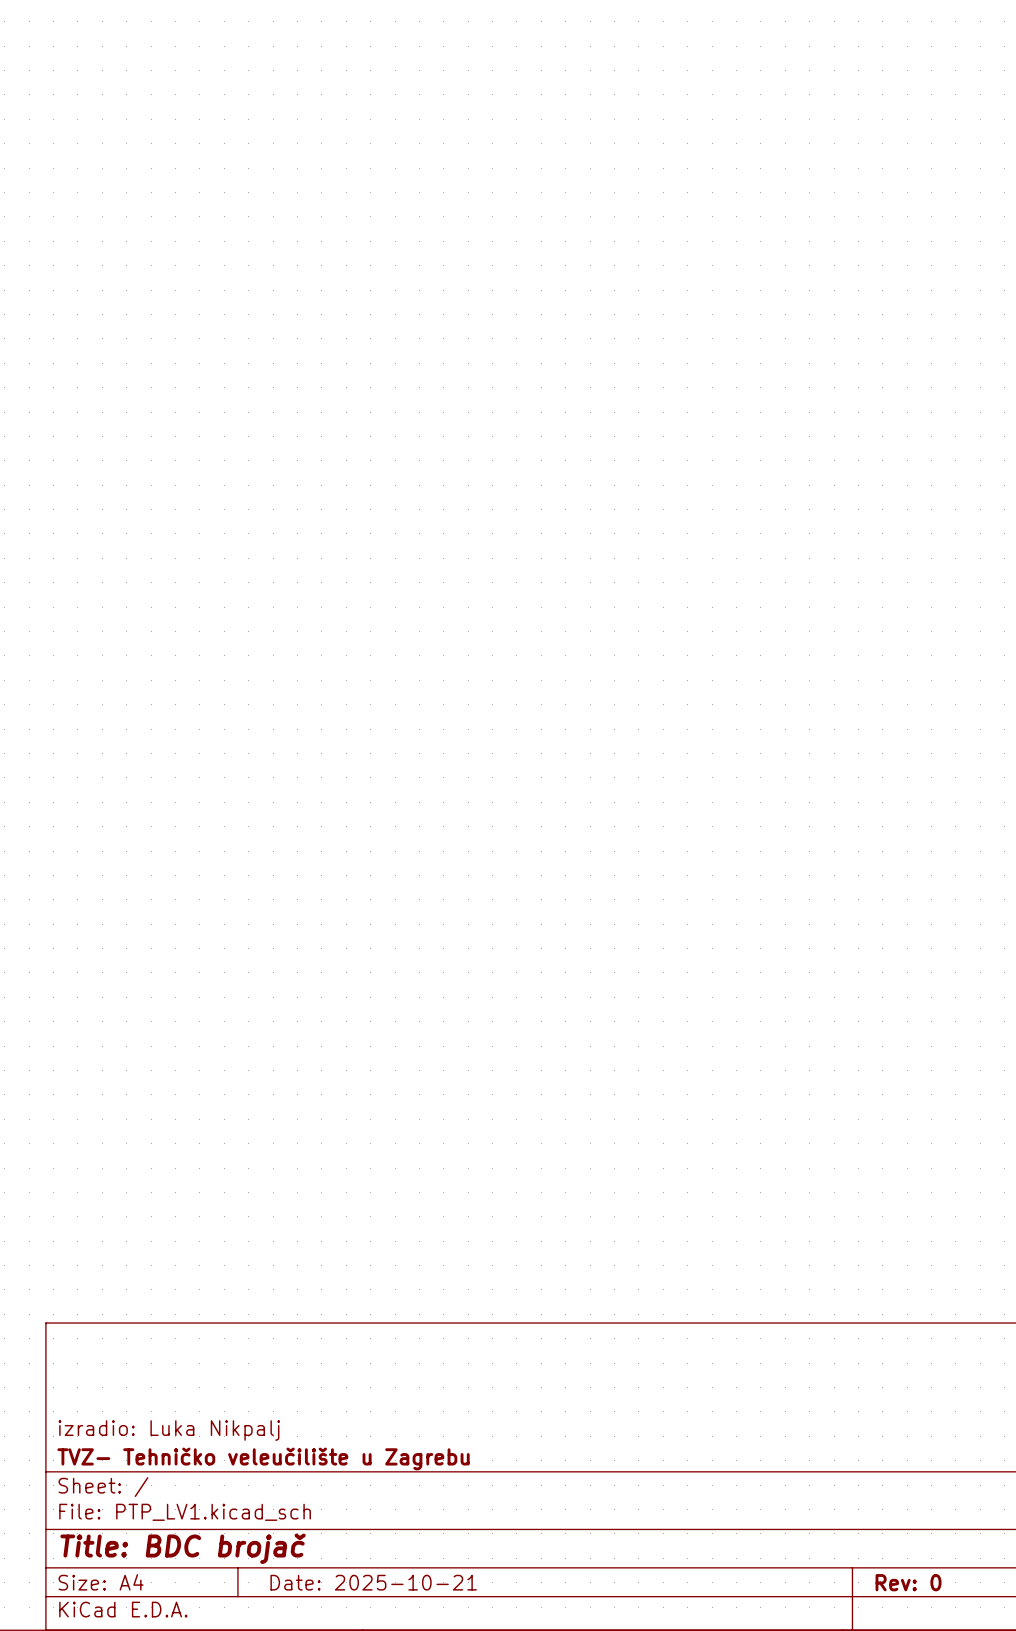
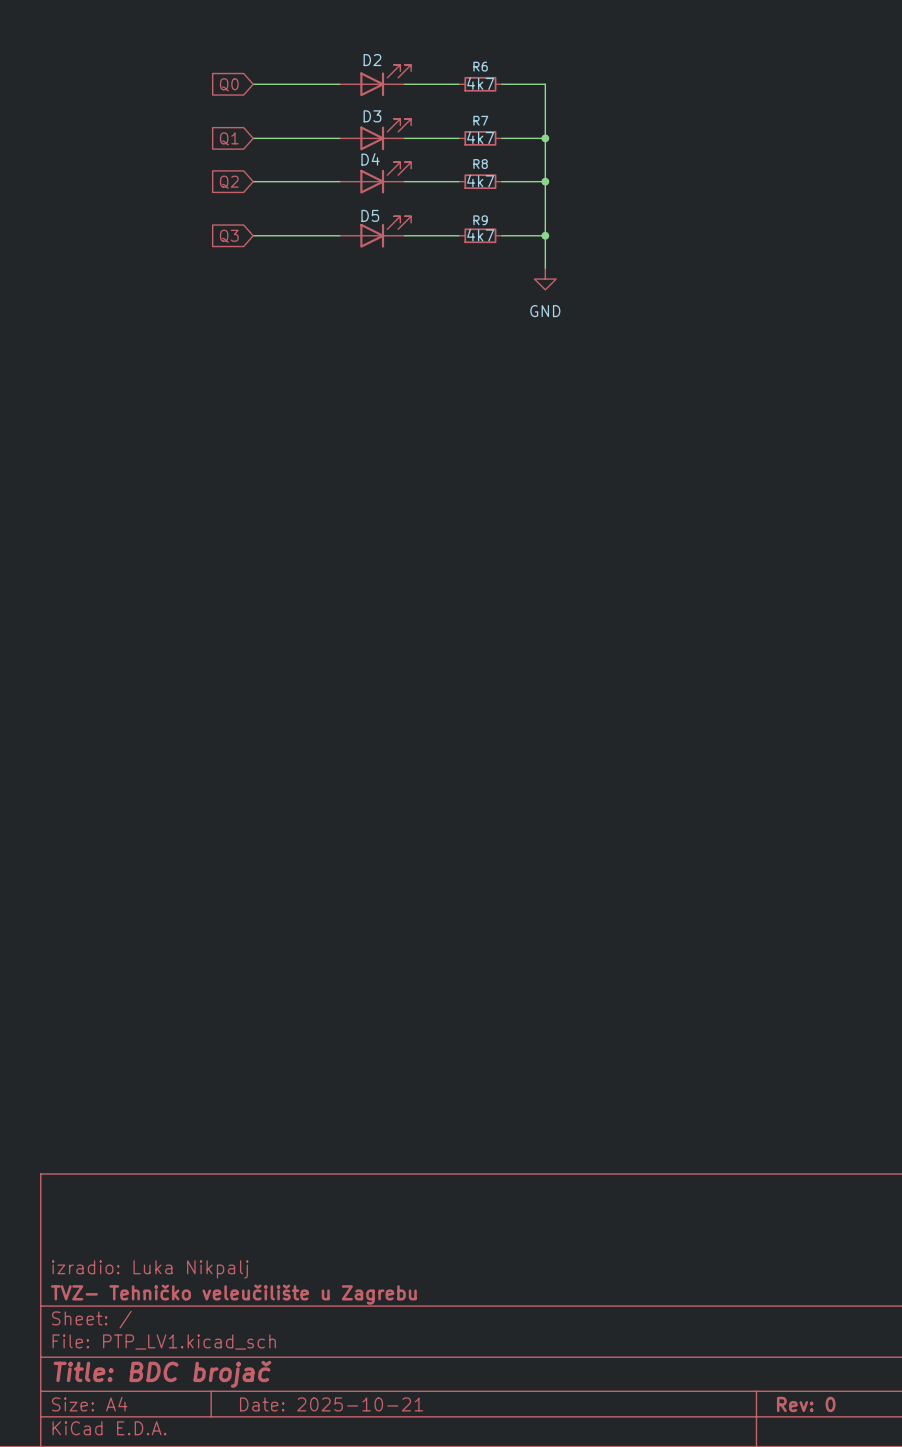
D2: none -> (375, 80)
wire: none -> (253, 84) (339, 84)
wire: none -> (404, 84) (458, 84)
R6: none -> 4k7 (480, 84)
wire: none -> (502, 84) (545, 84) (545, 268)
global label: none -> Q0 (229, 84)
D3: none -> (375, 134)
wire: none -> (253, 138) (339, 138)
wire: none -> (404, 138) (458, 138)
R7: none -> 4k7 (480, 138)
wire: none -> (502, 138) (545, 138)
junction: none -> (545, 138)
global label: none -> Q1 (229, 138)
D4: none -> (375, 177)
wire: none -> (253, 181) (339, 181)
wire: none -> (404, 181) (458, 181)
R8: none -> 4k7 (480, 181)
wire: none -> (502, 181) (545, 181)
junction: none -> (545, 181)
global label: none -> Q2 (229, 182)
D5: none -> (375, 231)
wire: none -> (253, 235) (339, 235)
wire: none -> (404, 235) (458, 235)
R9: none -> 4k7 (480, 235)
wire: none -> (502, 235) (545, 235)
junction: none -> (545, 235)
global label: none -> Q3 (229, 236)
power symbol: none -> GND (545, 279)

